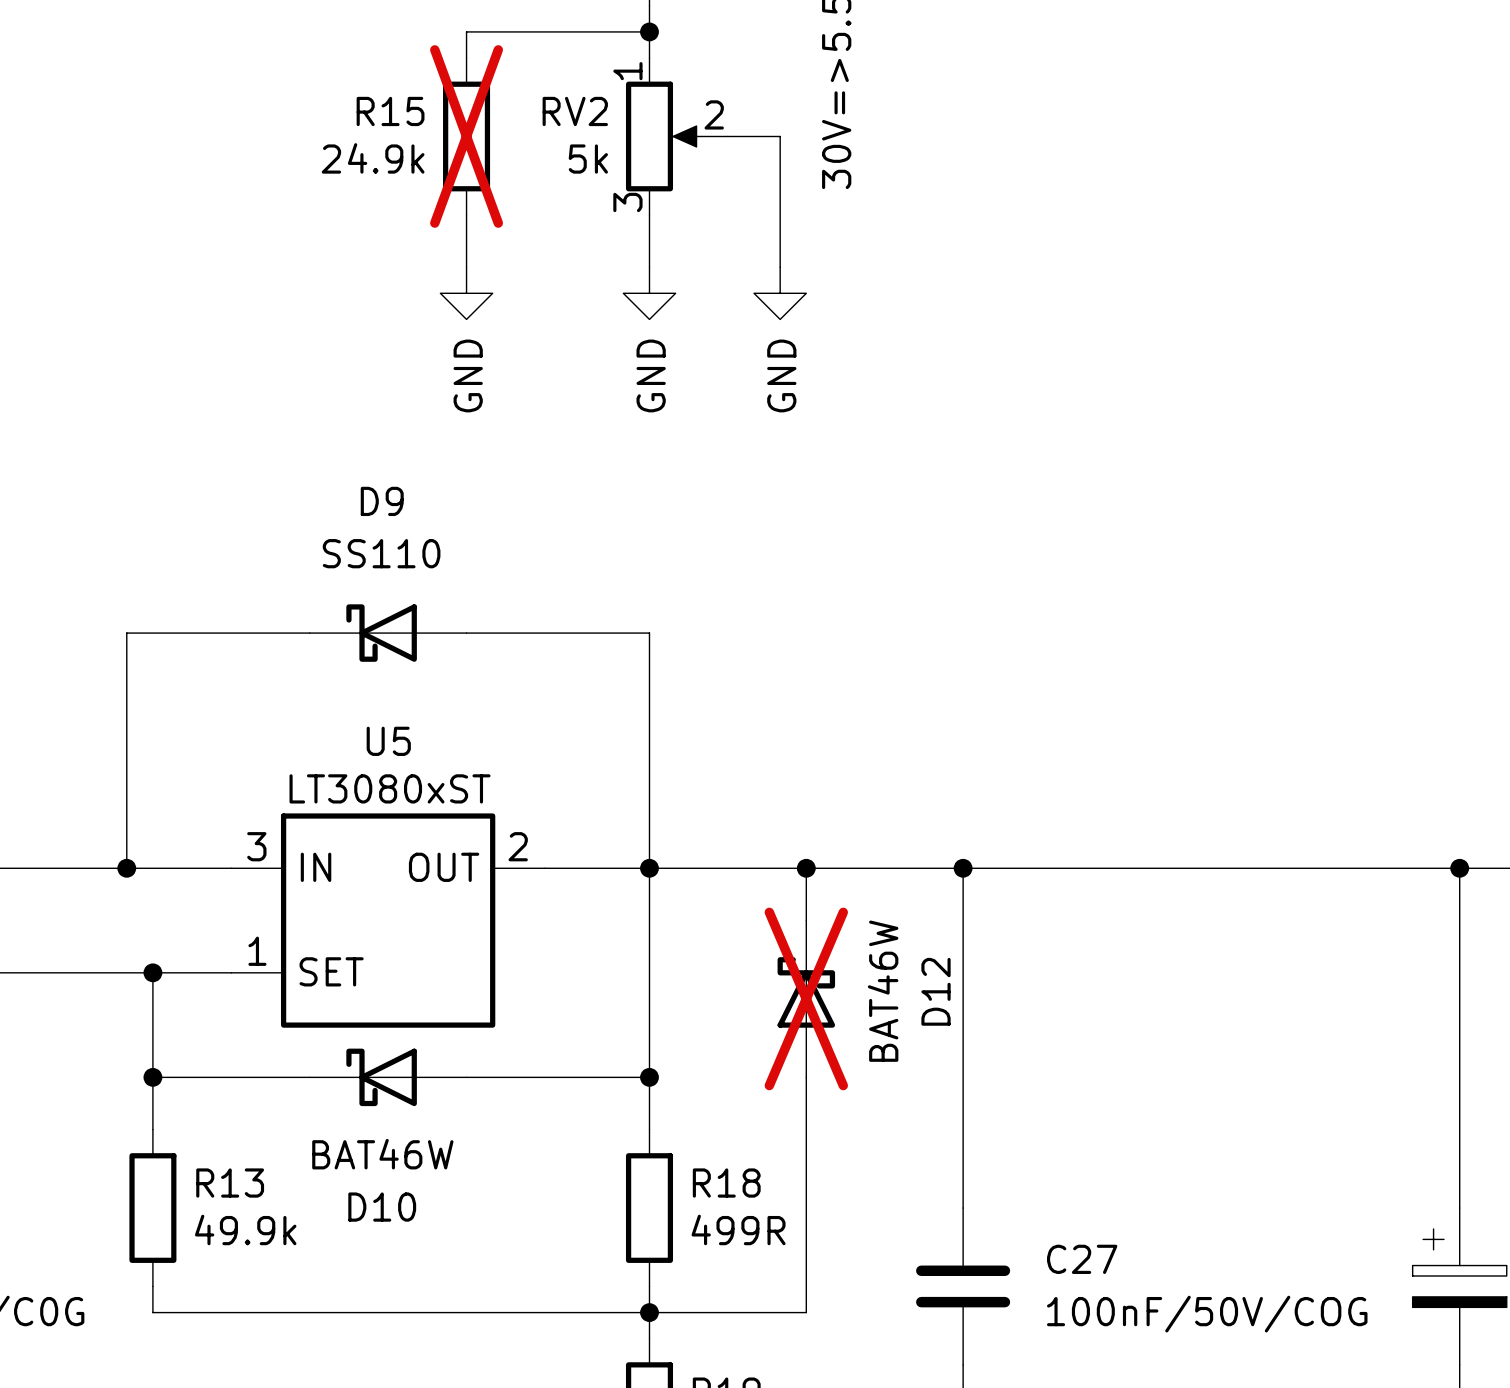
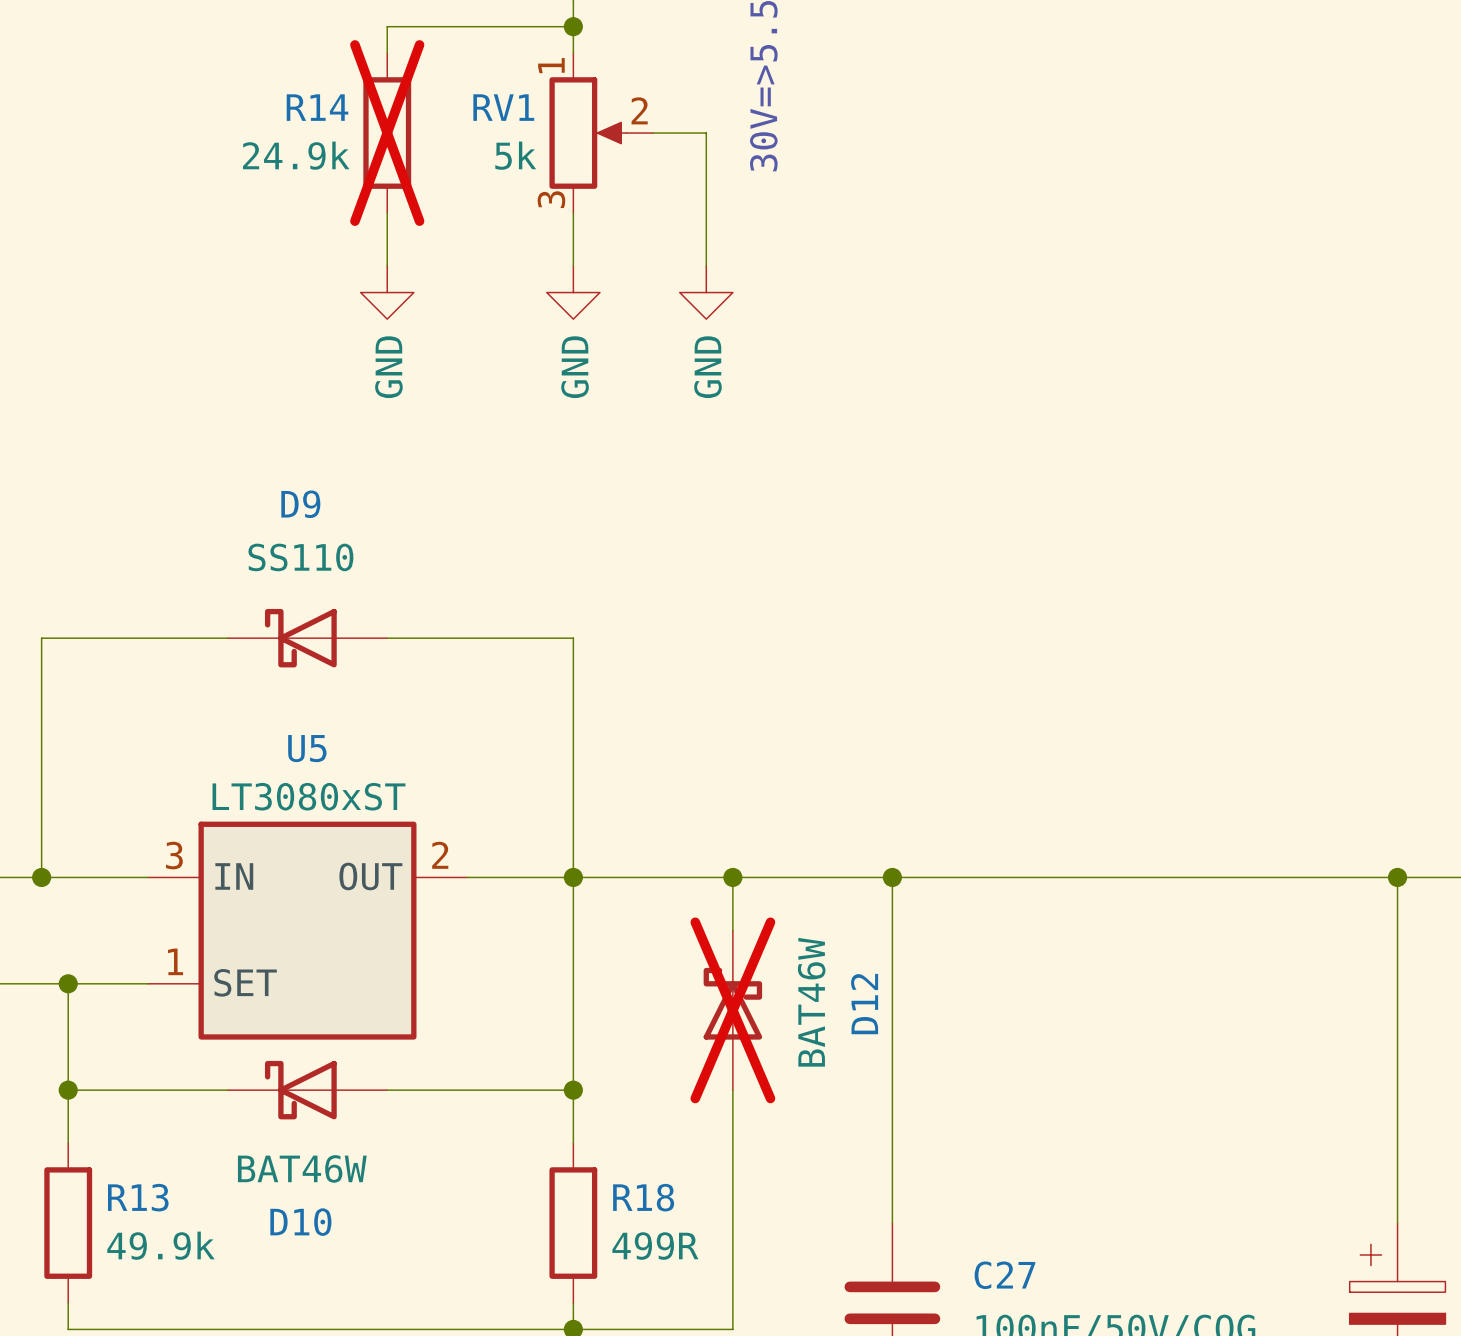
R15 name: R15 (390, 111) -> R14 (317, 107)
RV2 name: RV2 (575, 111) -> RV1 (503, 107)

